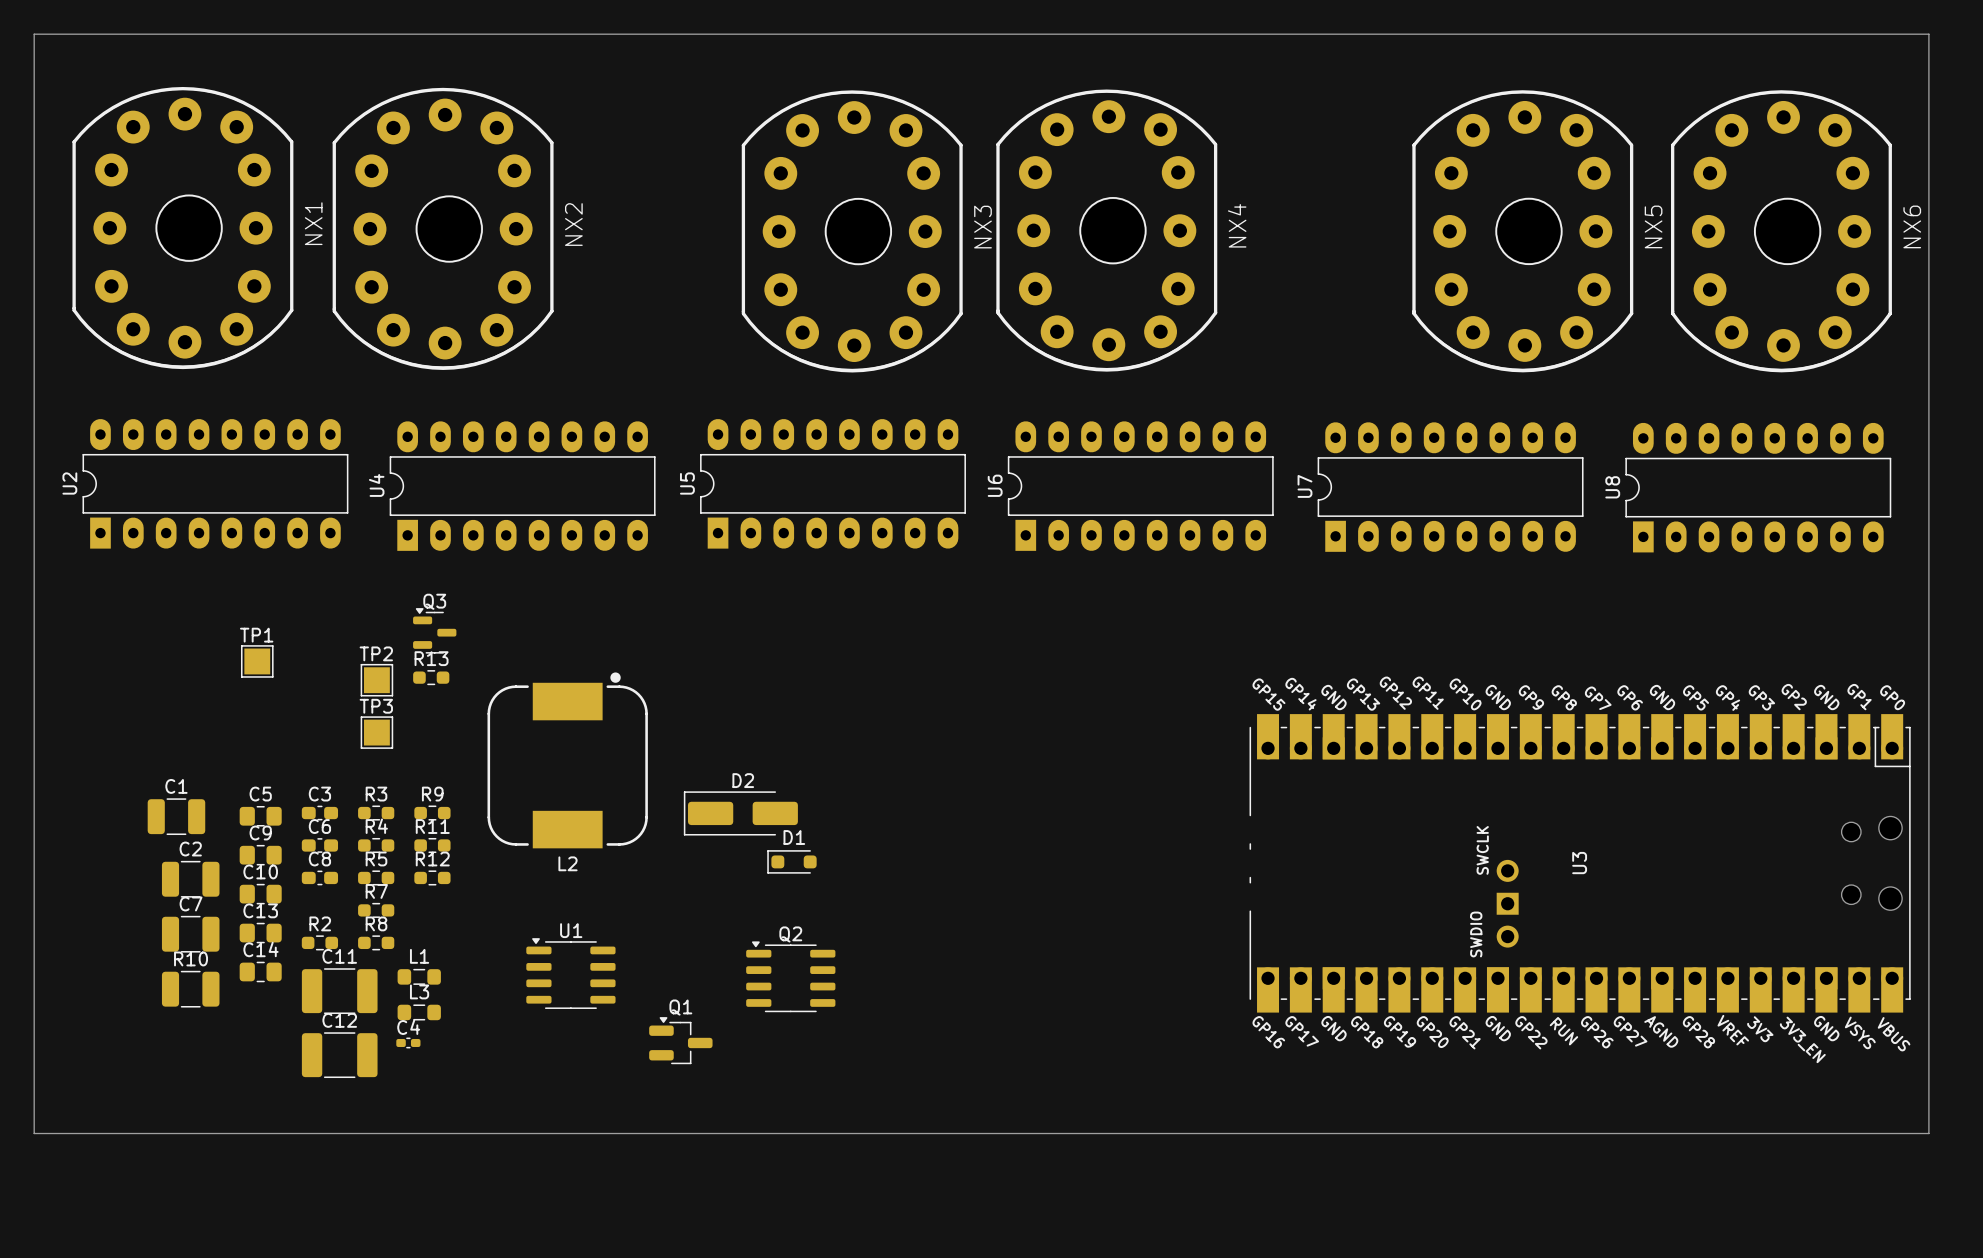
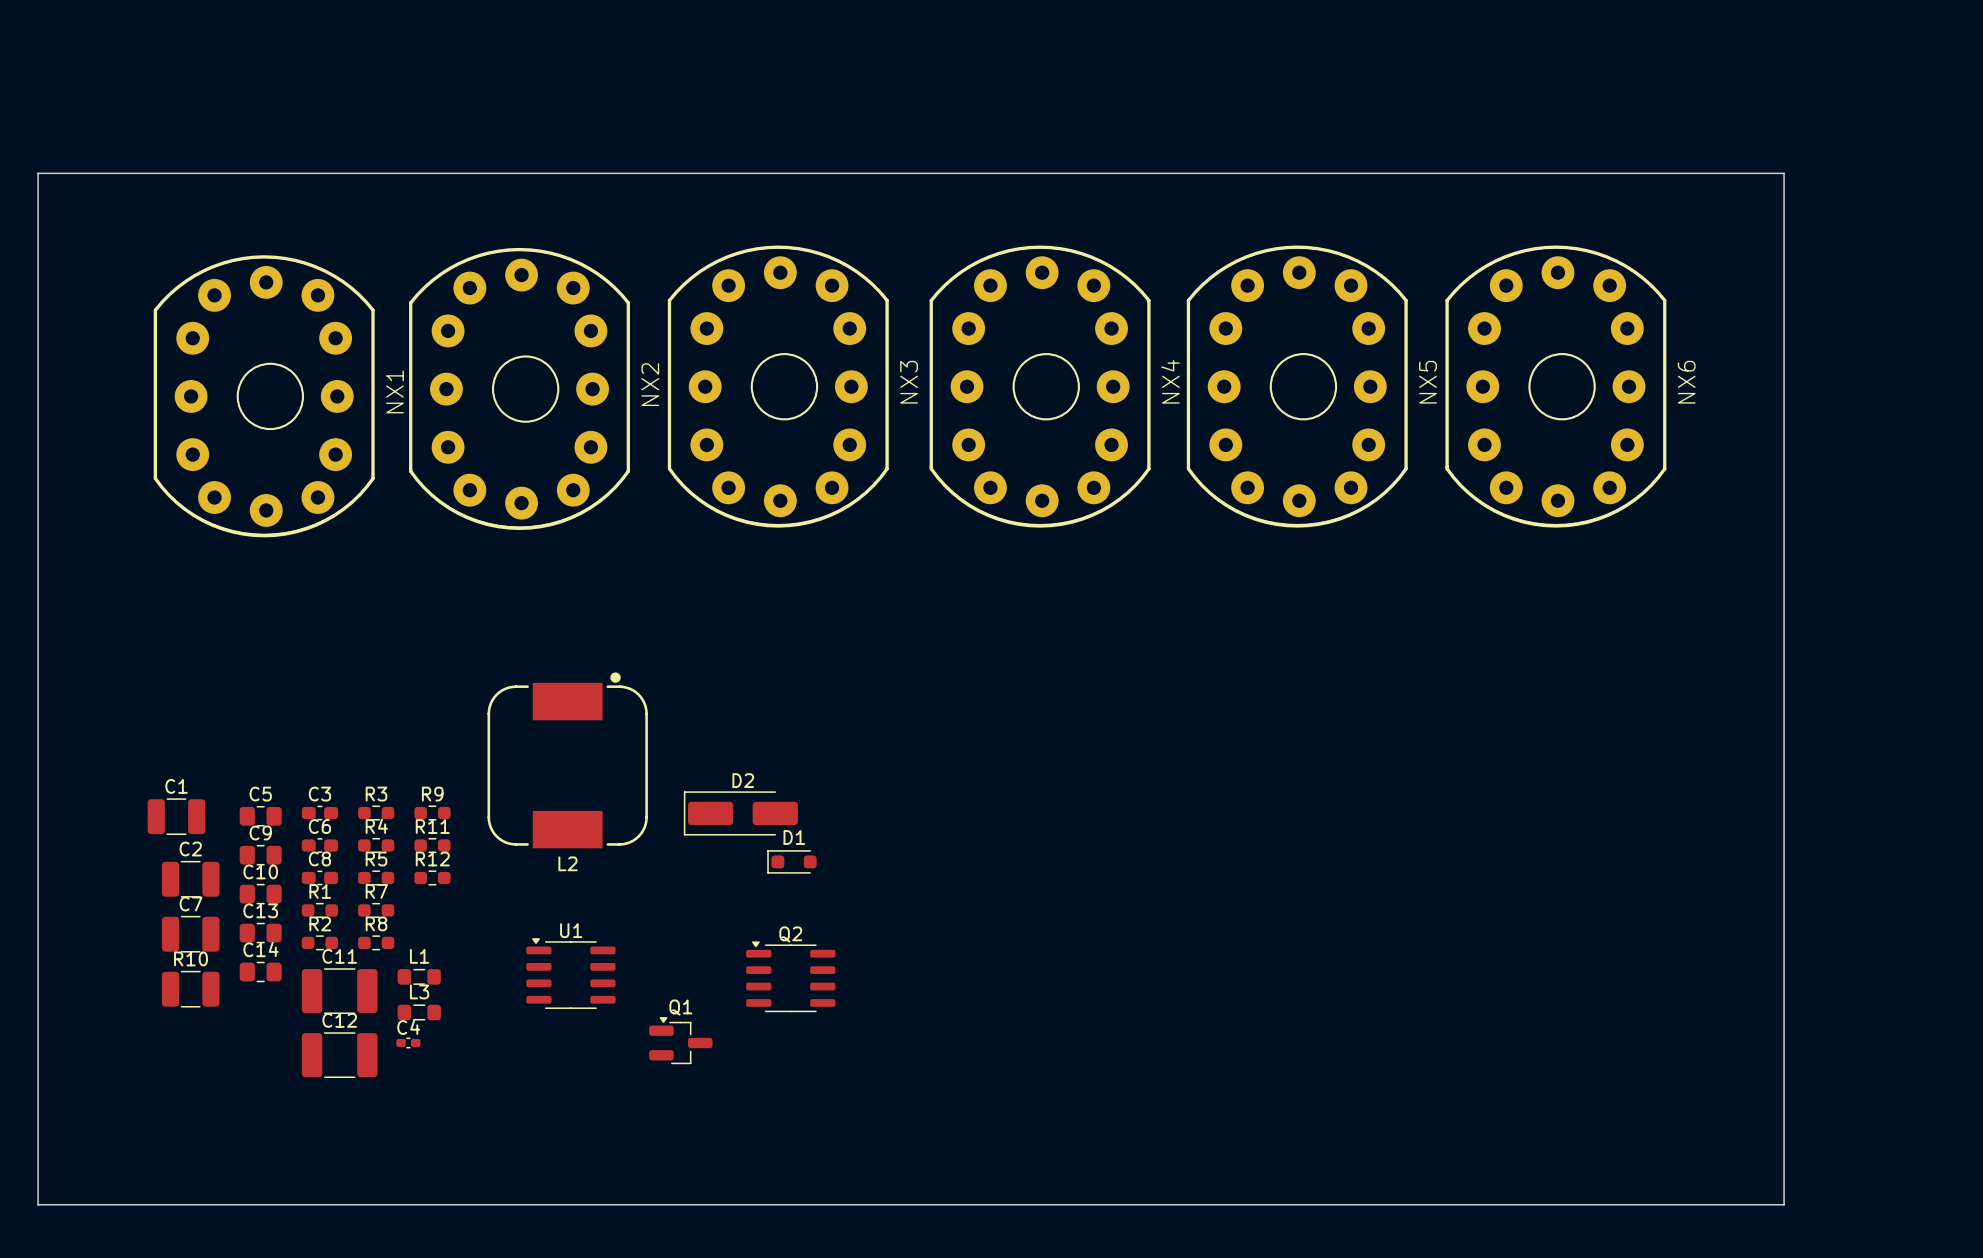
board edge: (34, 34) (1928, 34) (1928, 1133) (34, 1133) (34, 34) -> (38, 173) (38, 1204) (1784, 1204) (1784, 173) (38, 173)
NX1 position: (182, 228) -> (264, 396)
NX2 position: (443, 228) -> (519, 388)
NX4 position: (1106, 230) -> (1040, 386)
NX3 position: (852, 231) -> (778, 386)
NX5 position: (1522, 231) -> (1297, 386)
NX6 position: (1781, 231) -> (1555, 386)
U2: (215, 483) -> none
U5: (833, 483) -> none
U4: (522, 486) -> none
U6: (1140, 486) -> none
U7: (1450, 487) -> none
U8: (1758, 487) -> none
Q3: (434, 630) -> none
TP1: (257, 661) -> none
R13: (431, 677) -> none
TP2: (376, 680) -> none
TP3: (376, 732) -> none
U3: (1580, 863) -> none
R1: none -> (319, 910)

